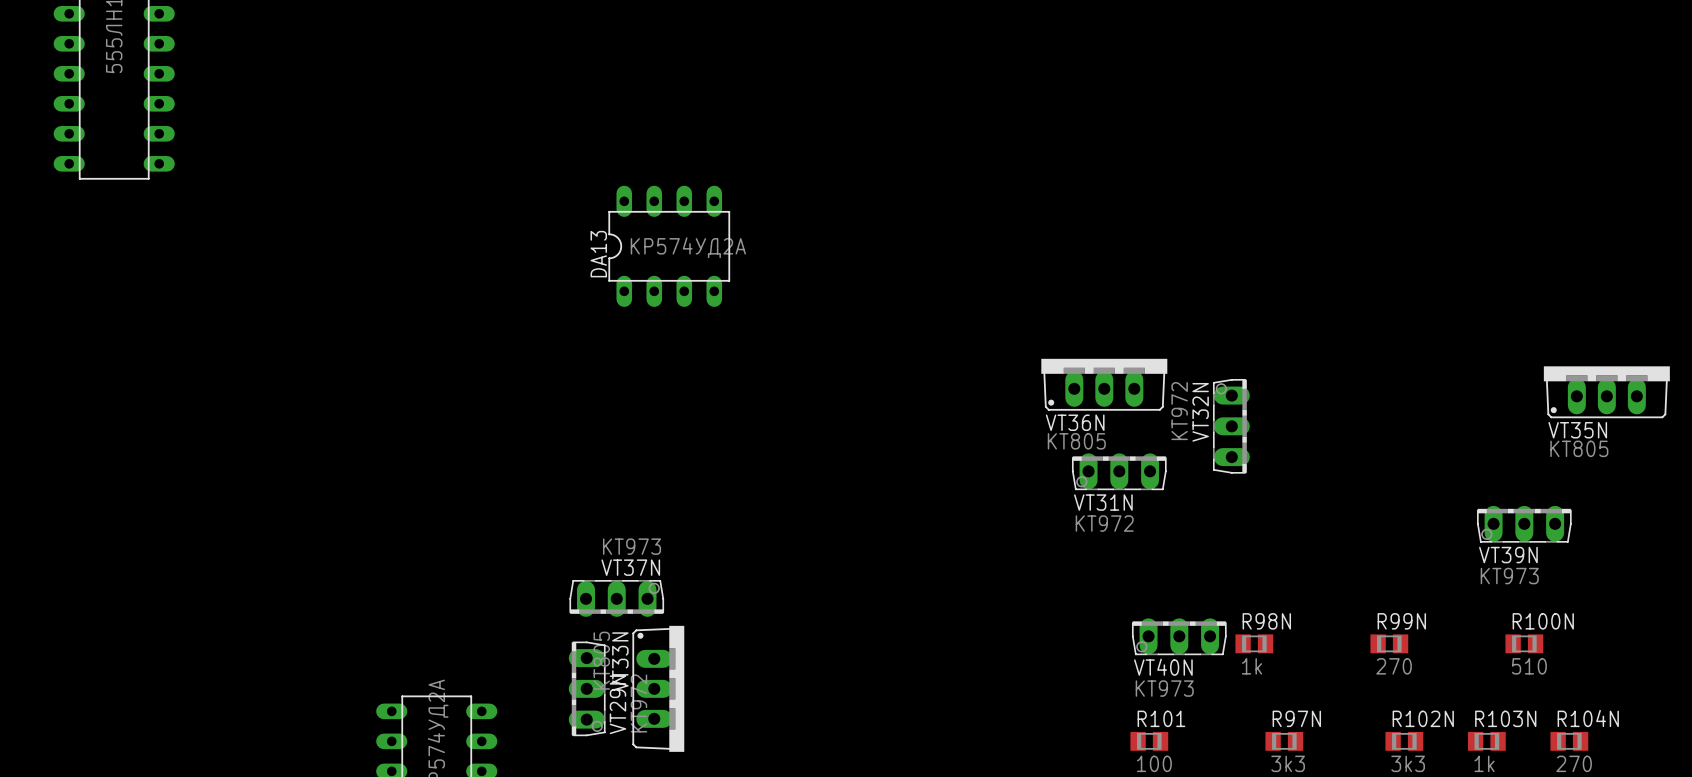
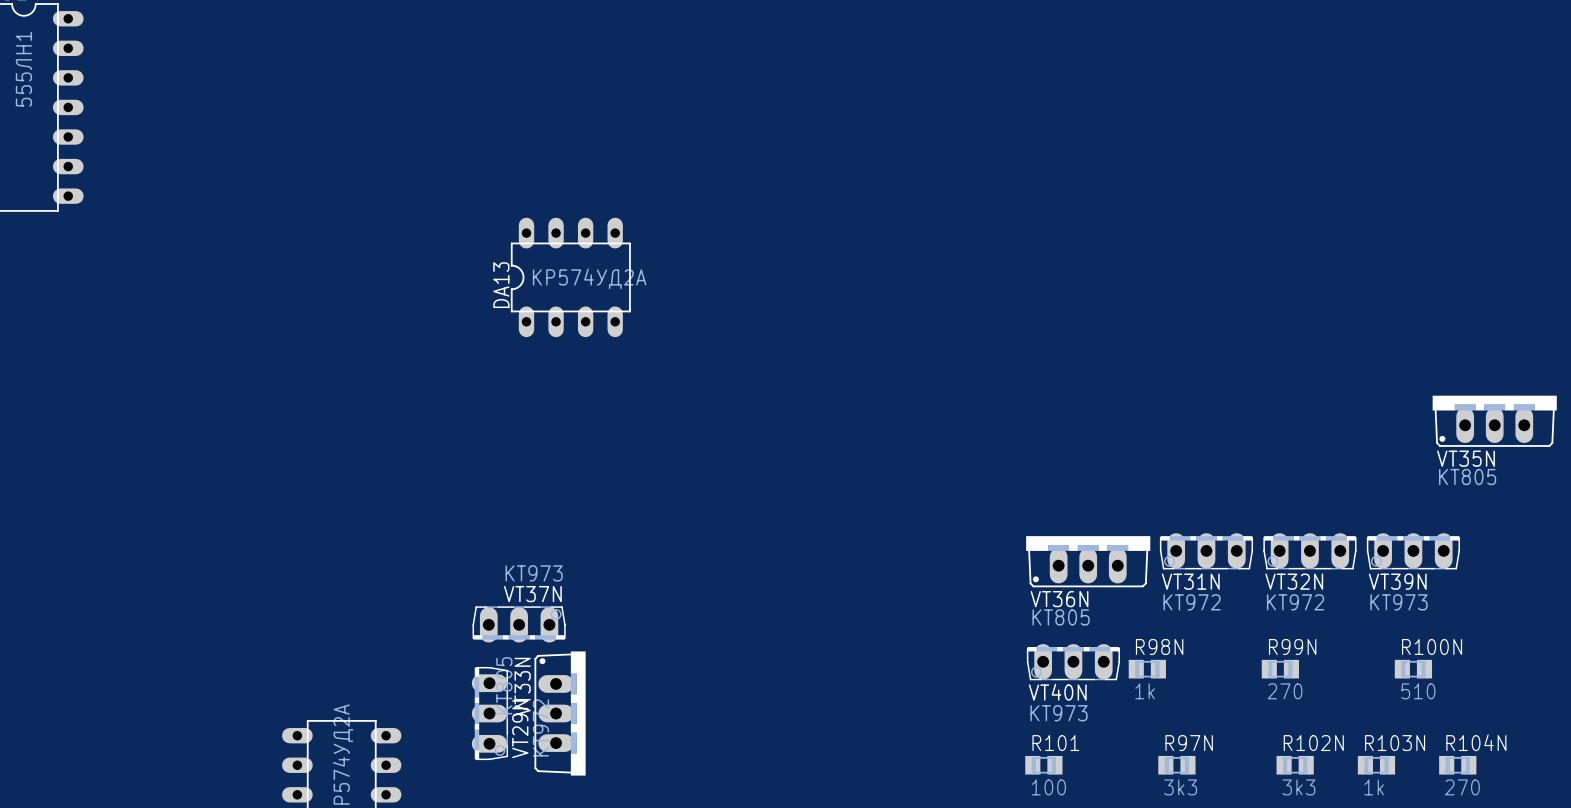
VT36N position: (1104, 384) -> (1088, 561)
VT32N rotation: 0° (1231, 426) -> 90° counterclockwise (1309, 551)
VT32N position: (1231, 426) -> (1309, 551)
VT31N position: (1119, 471) -> (1206, 551)

